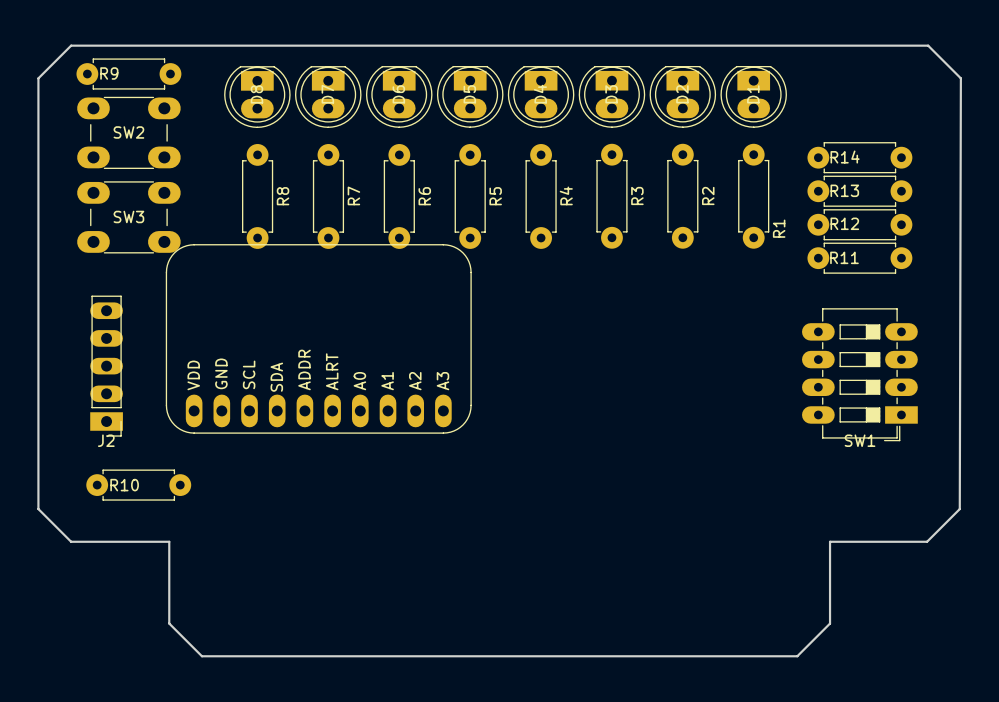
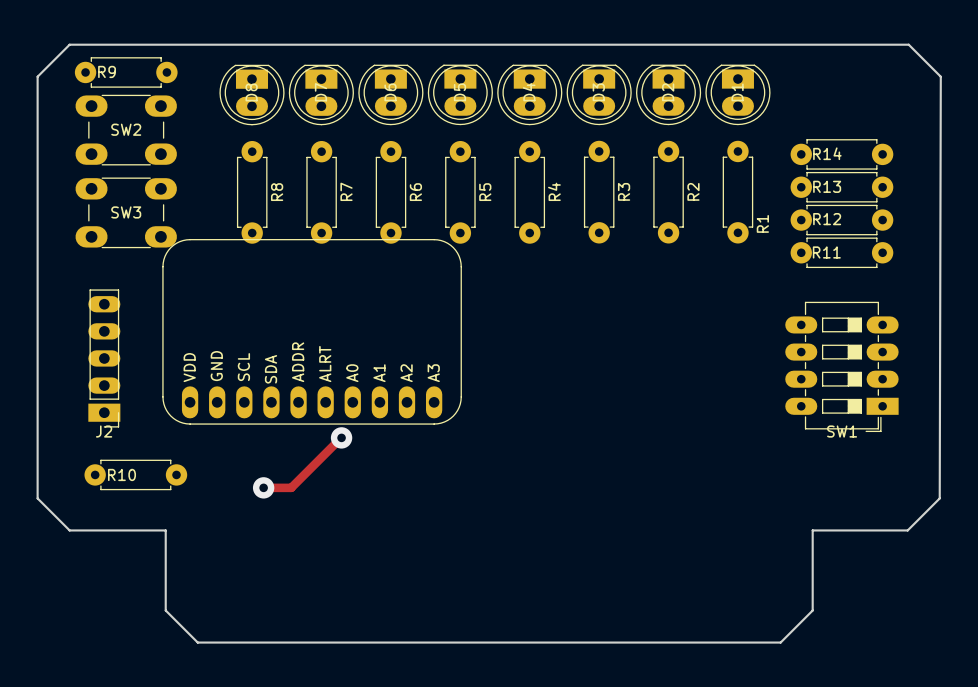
track: none -> (341, 437) (291, 487) (263, 487)
via: none -> (341, 437)
via: none -> (263, 487)

